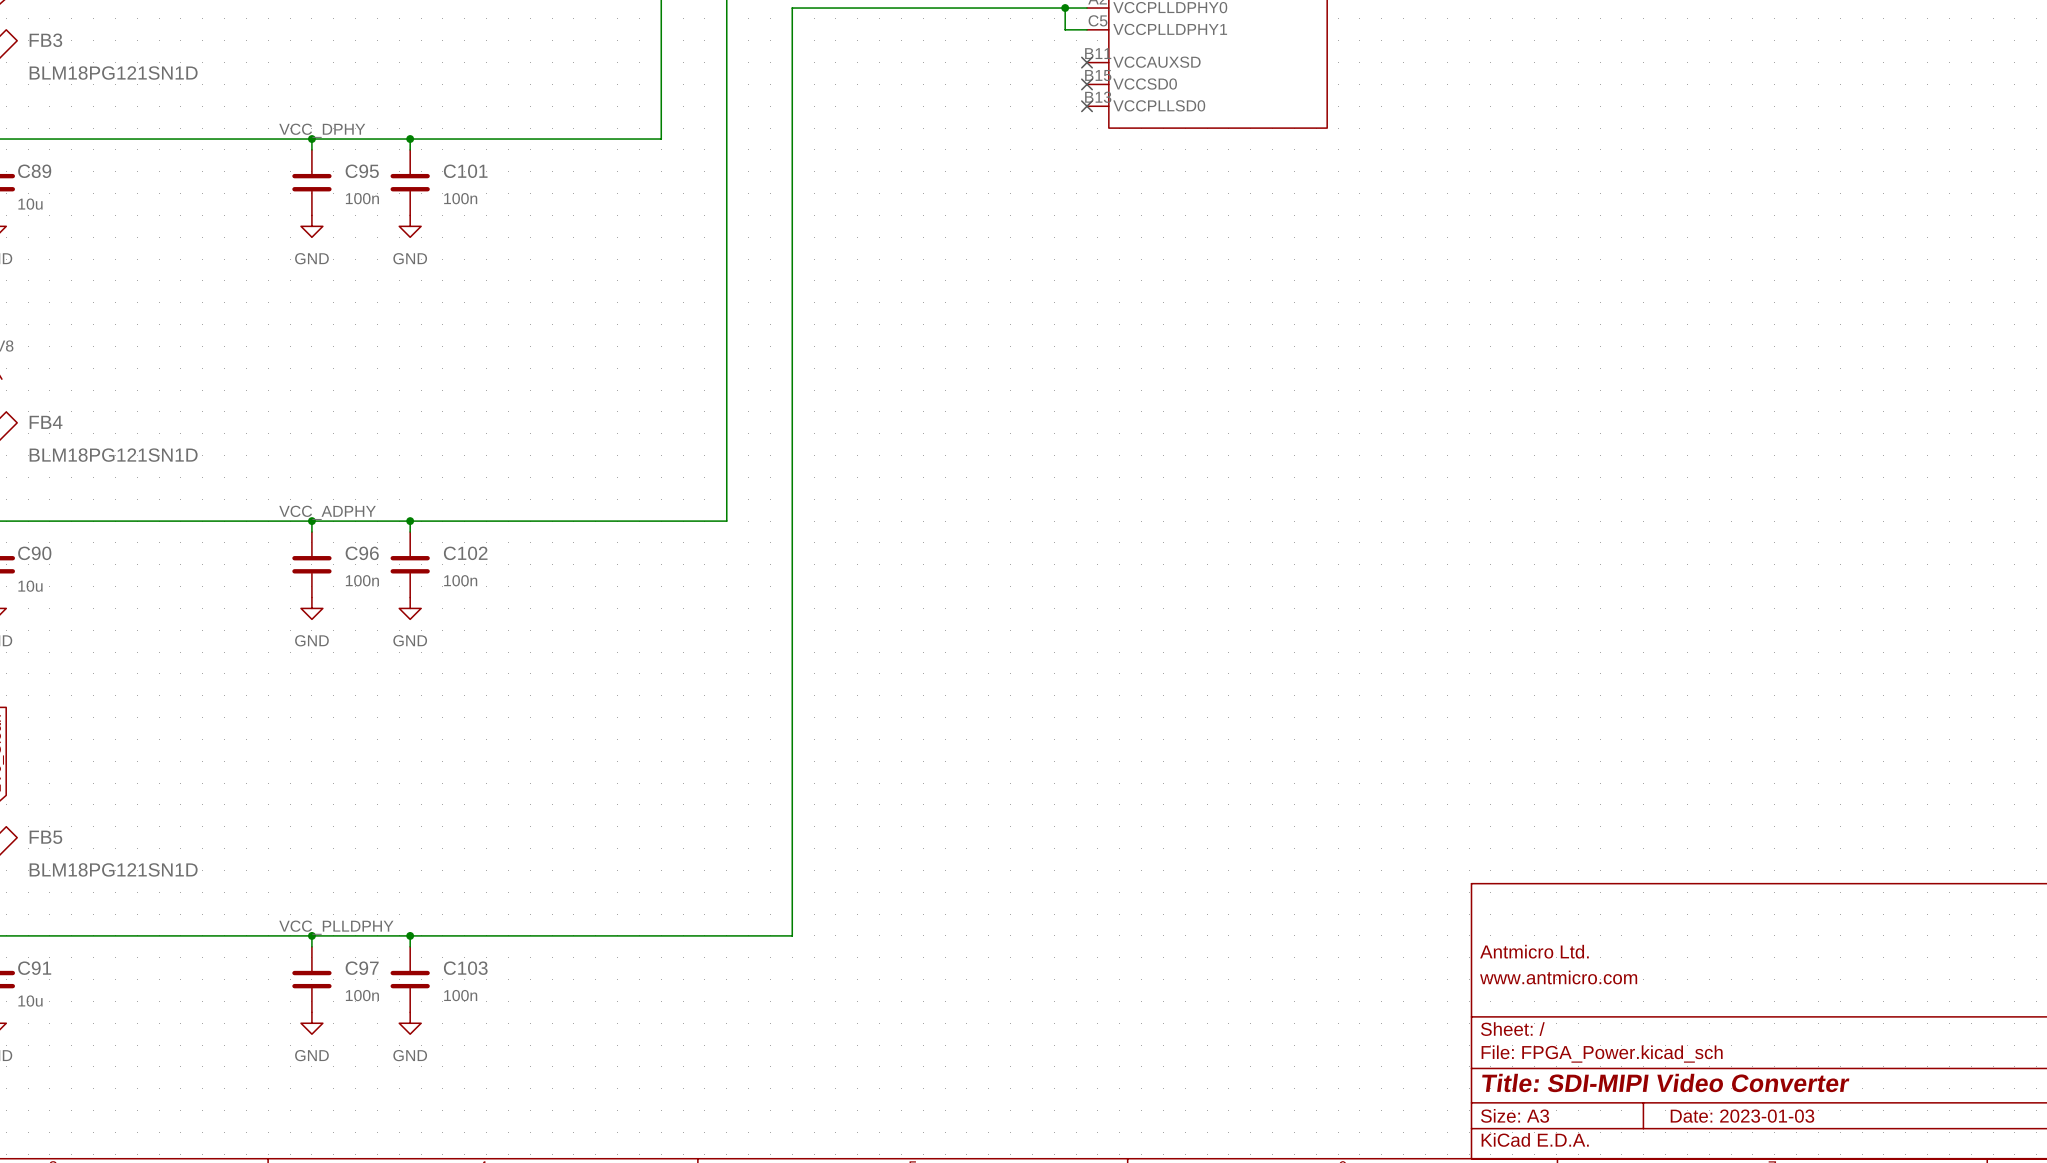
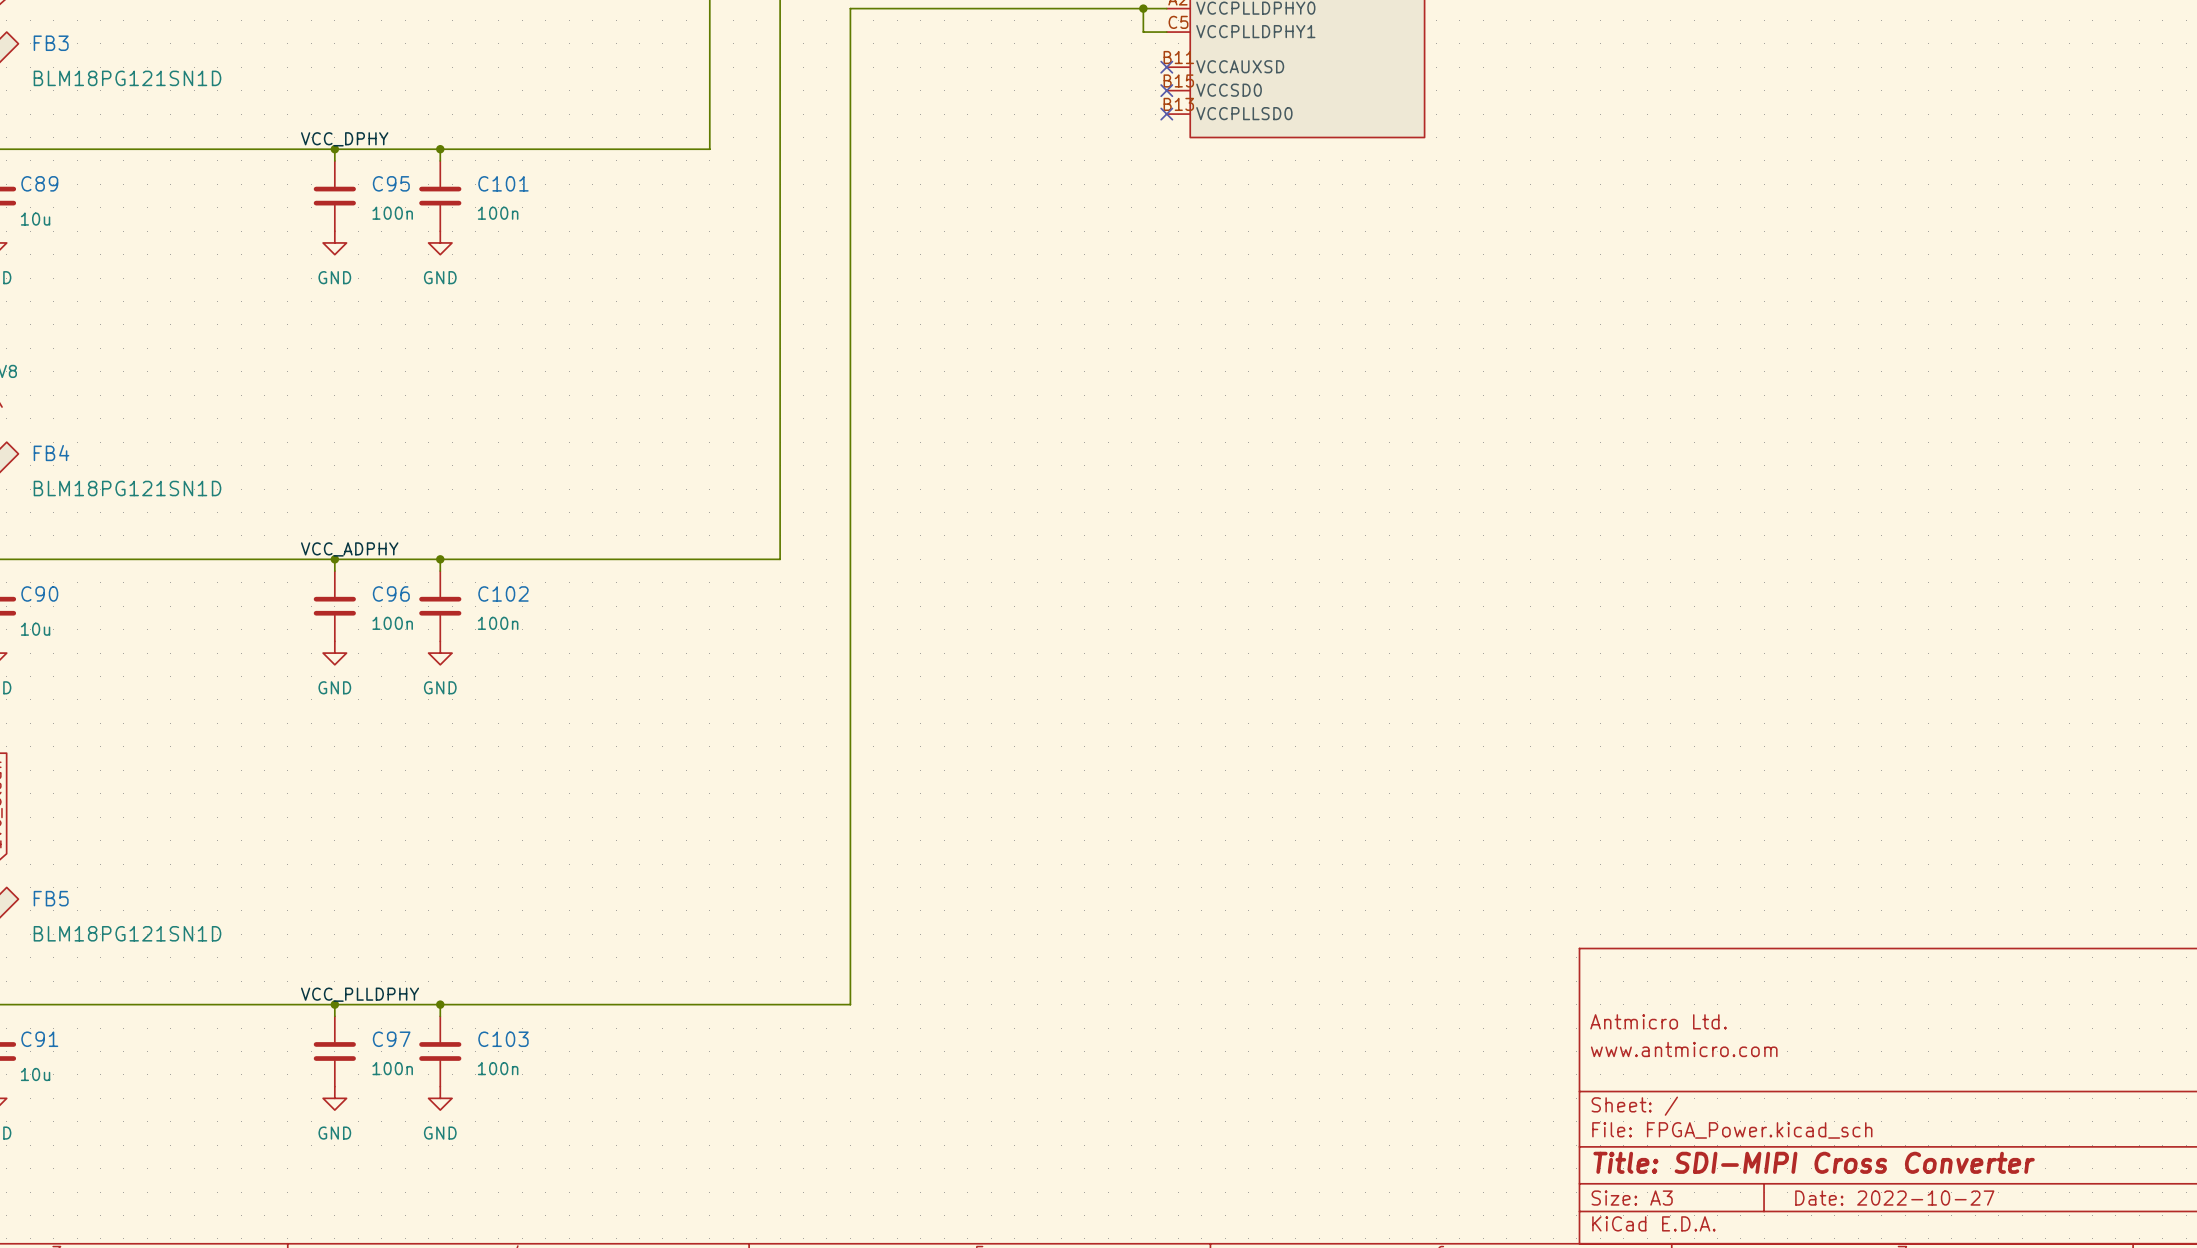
title block: Title: SDI-MIPI Video Converter (1665, 1082) -> Title: SDI-MIPI Cross Converter (1814, 1162)
title block: Date: 2023-01-03 (1742, 1116) -> Date: 2022-10-27 (1894, 1198)

